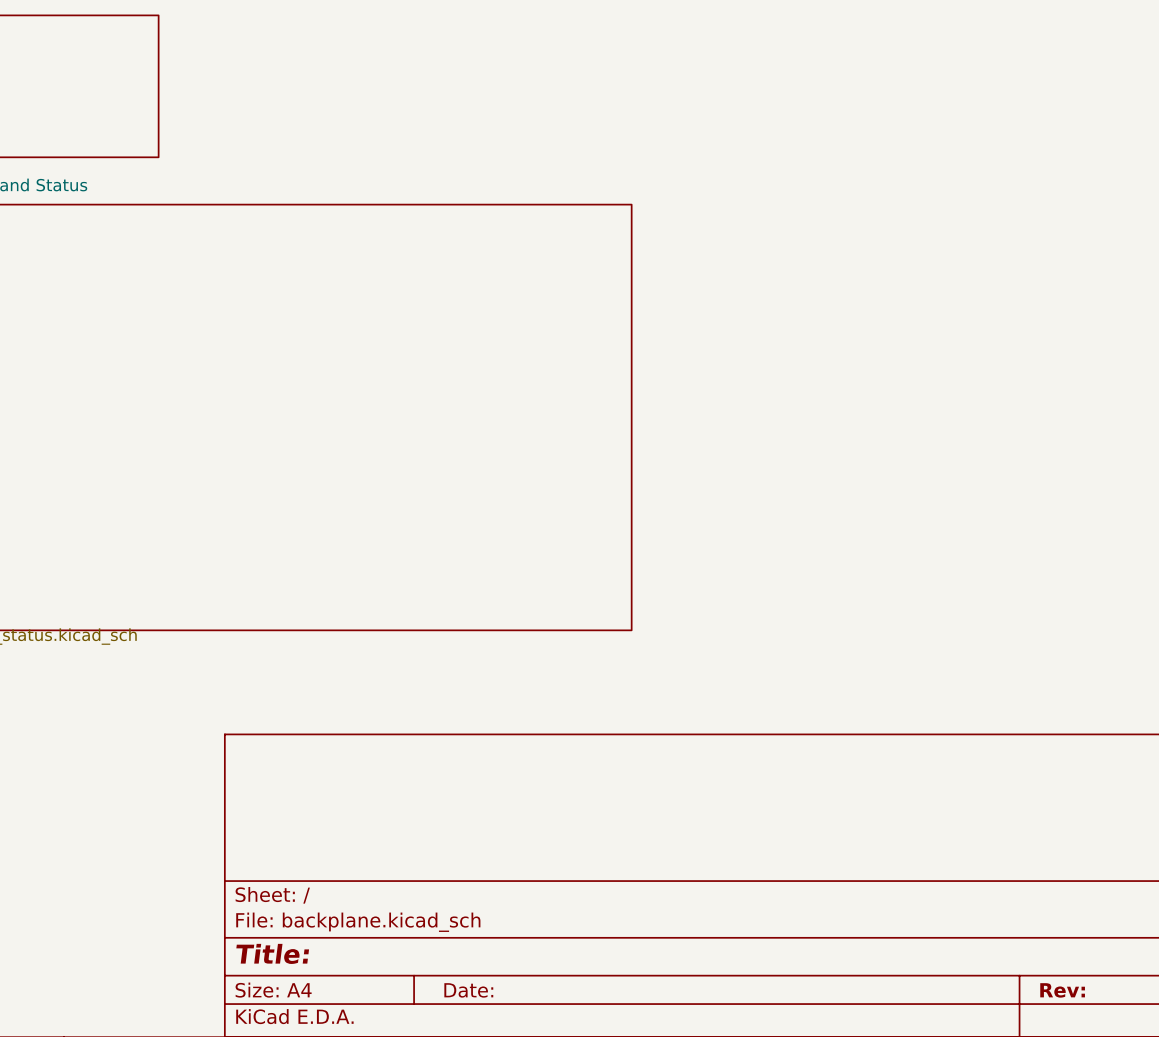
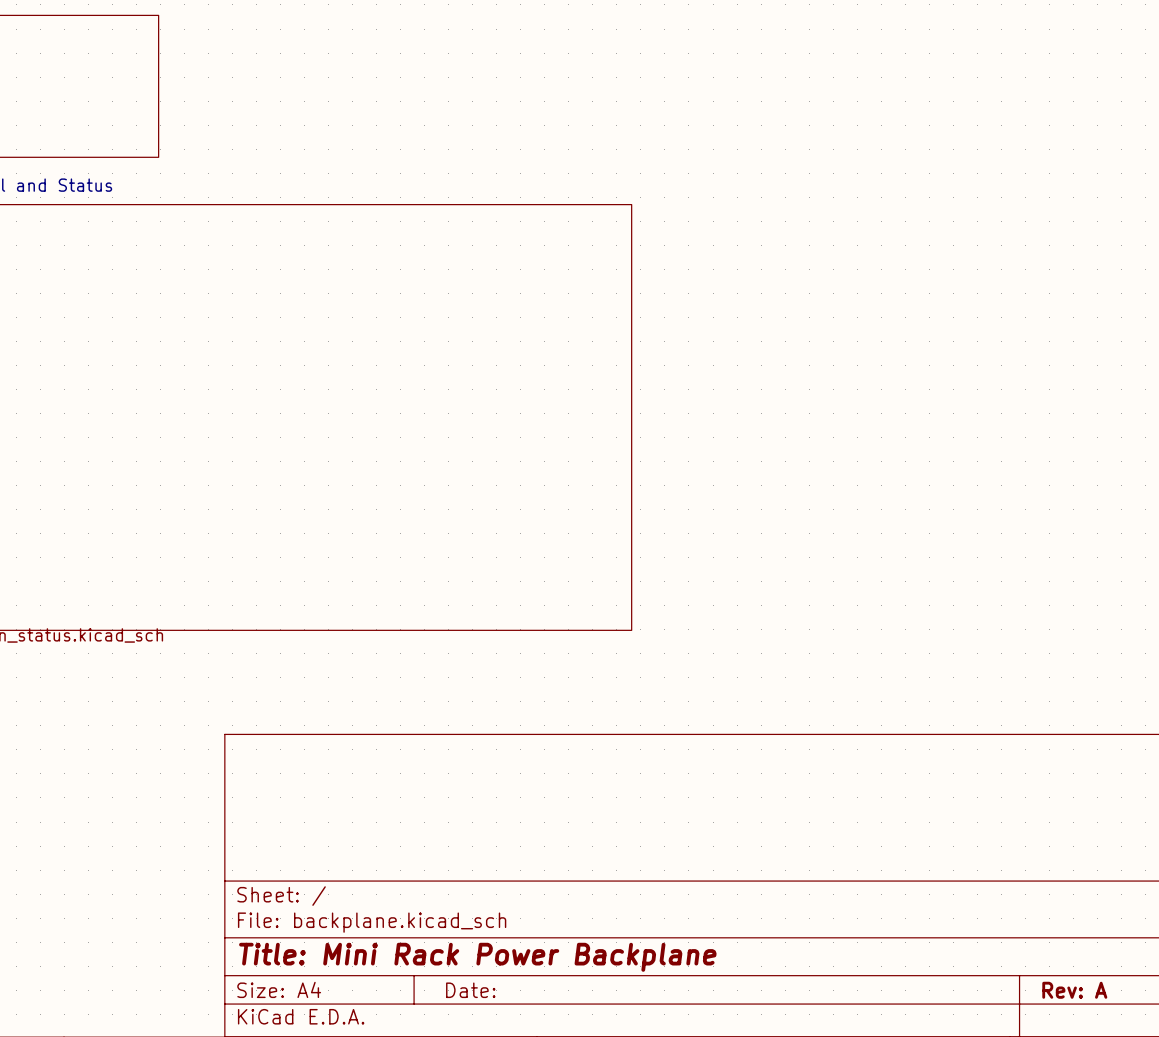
title block: Title: (272, 953) -> Title: Mini Rack Power Backplane (477, 957)
title block: Rev: (1062, 990) -> Rev: A (1074, 990)

